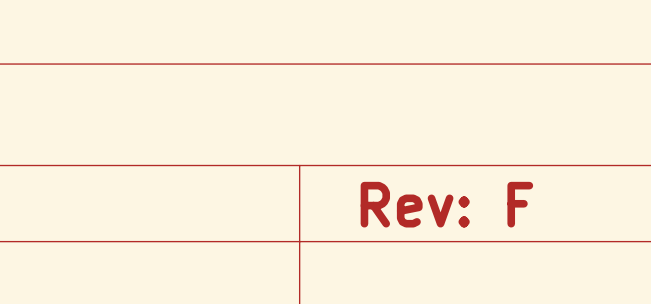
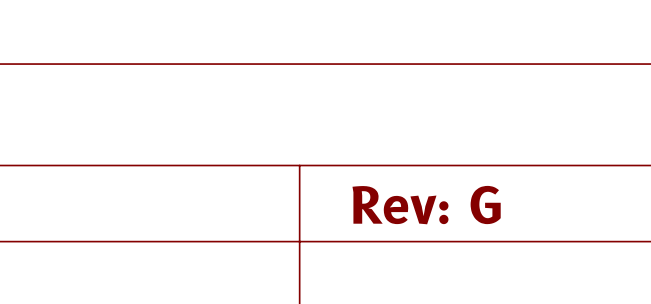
title block: Rev: F (446, 204) -> Rev: G (426, 205)

